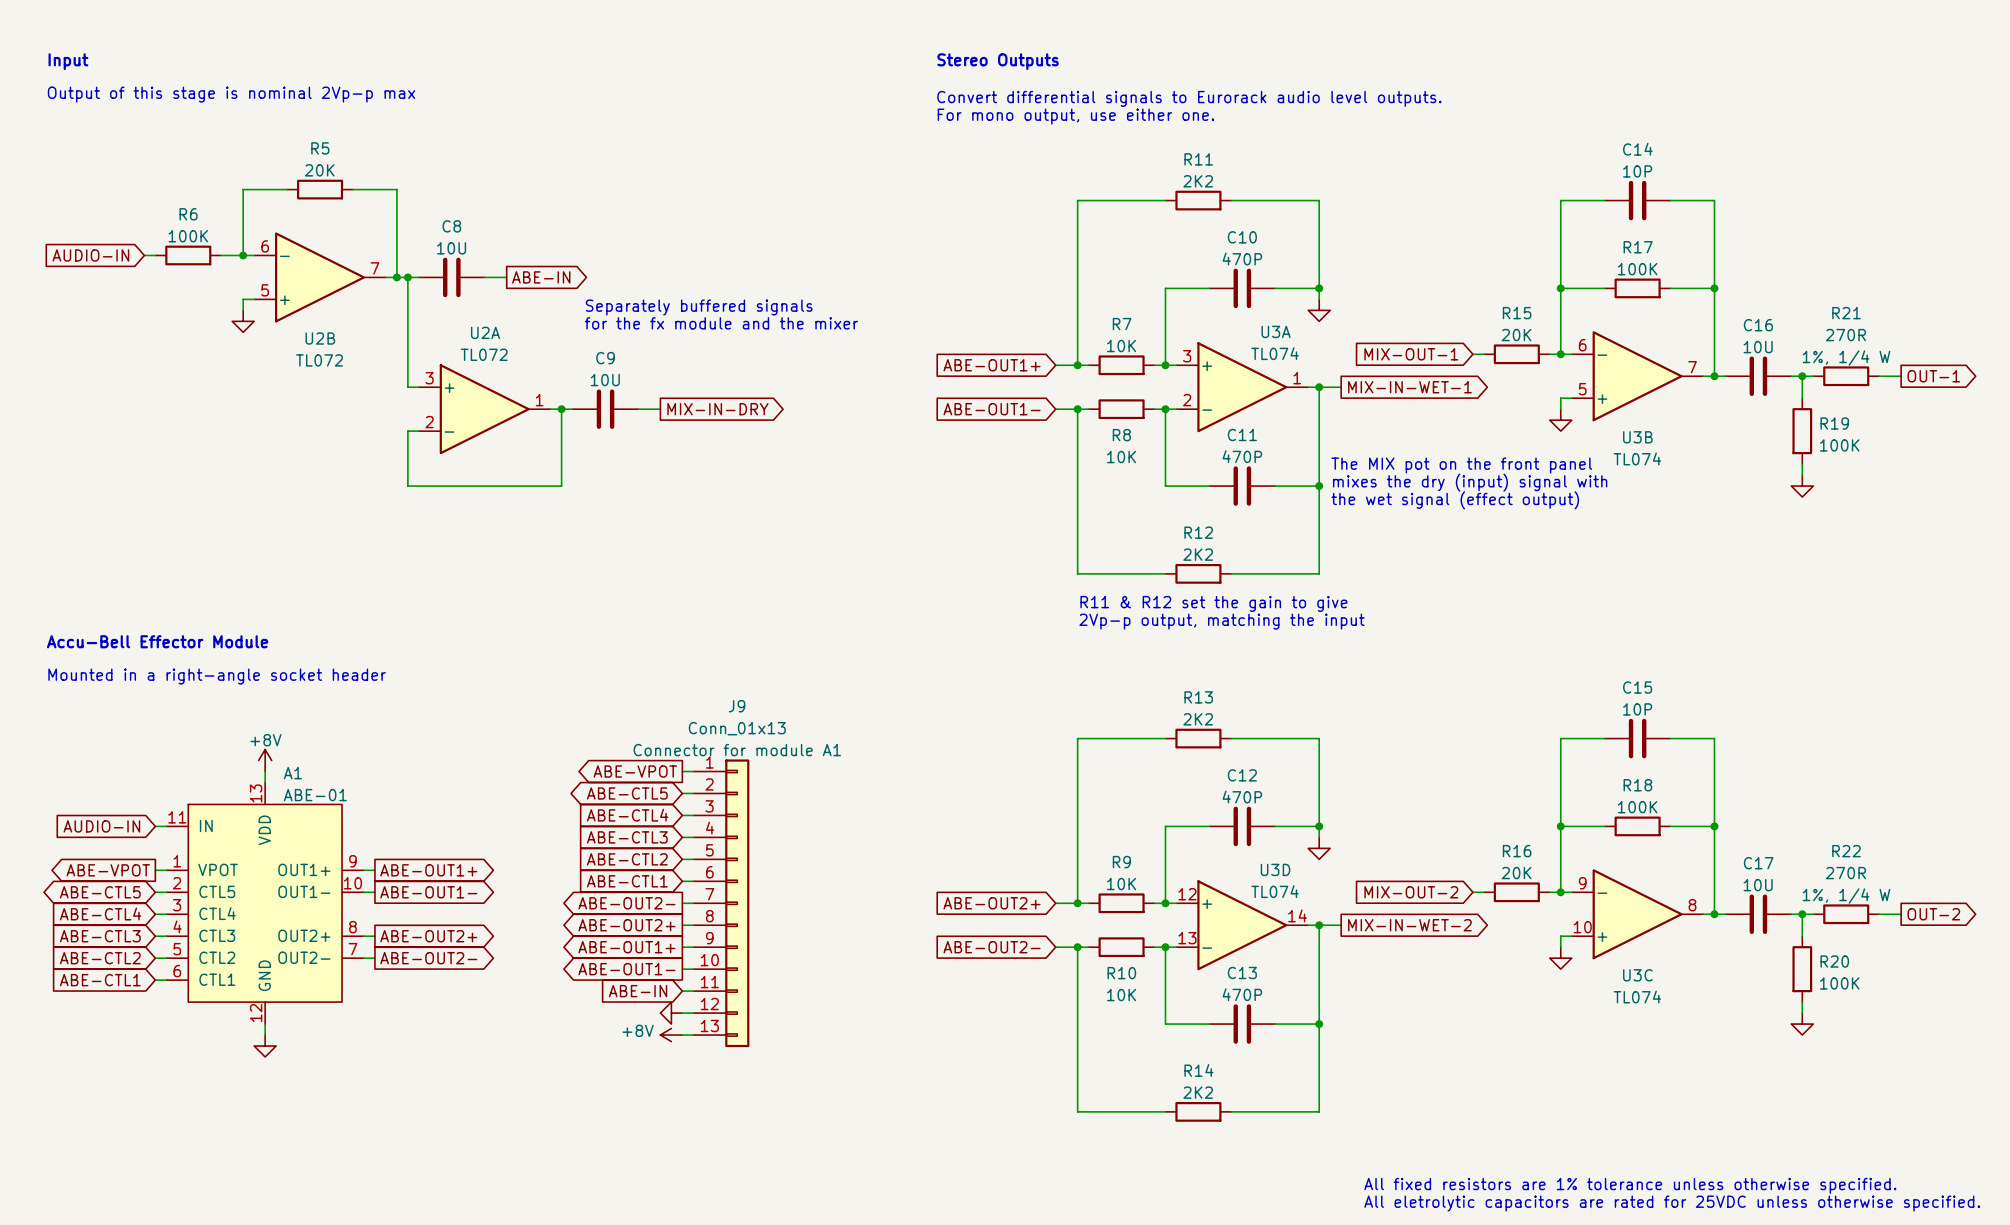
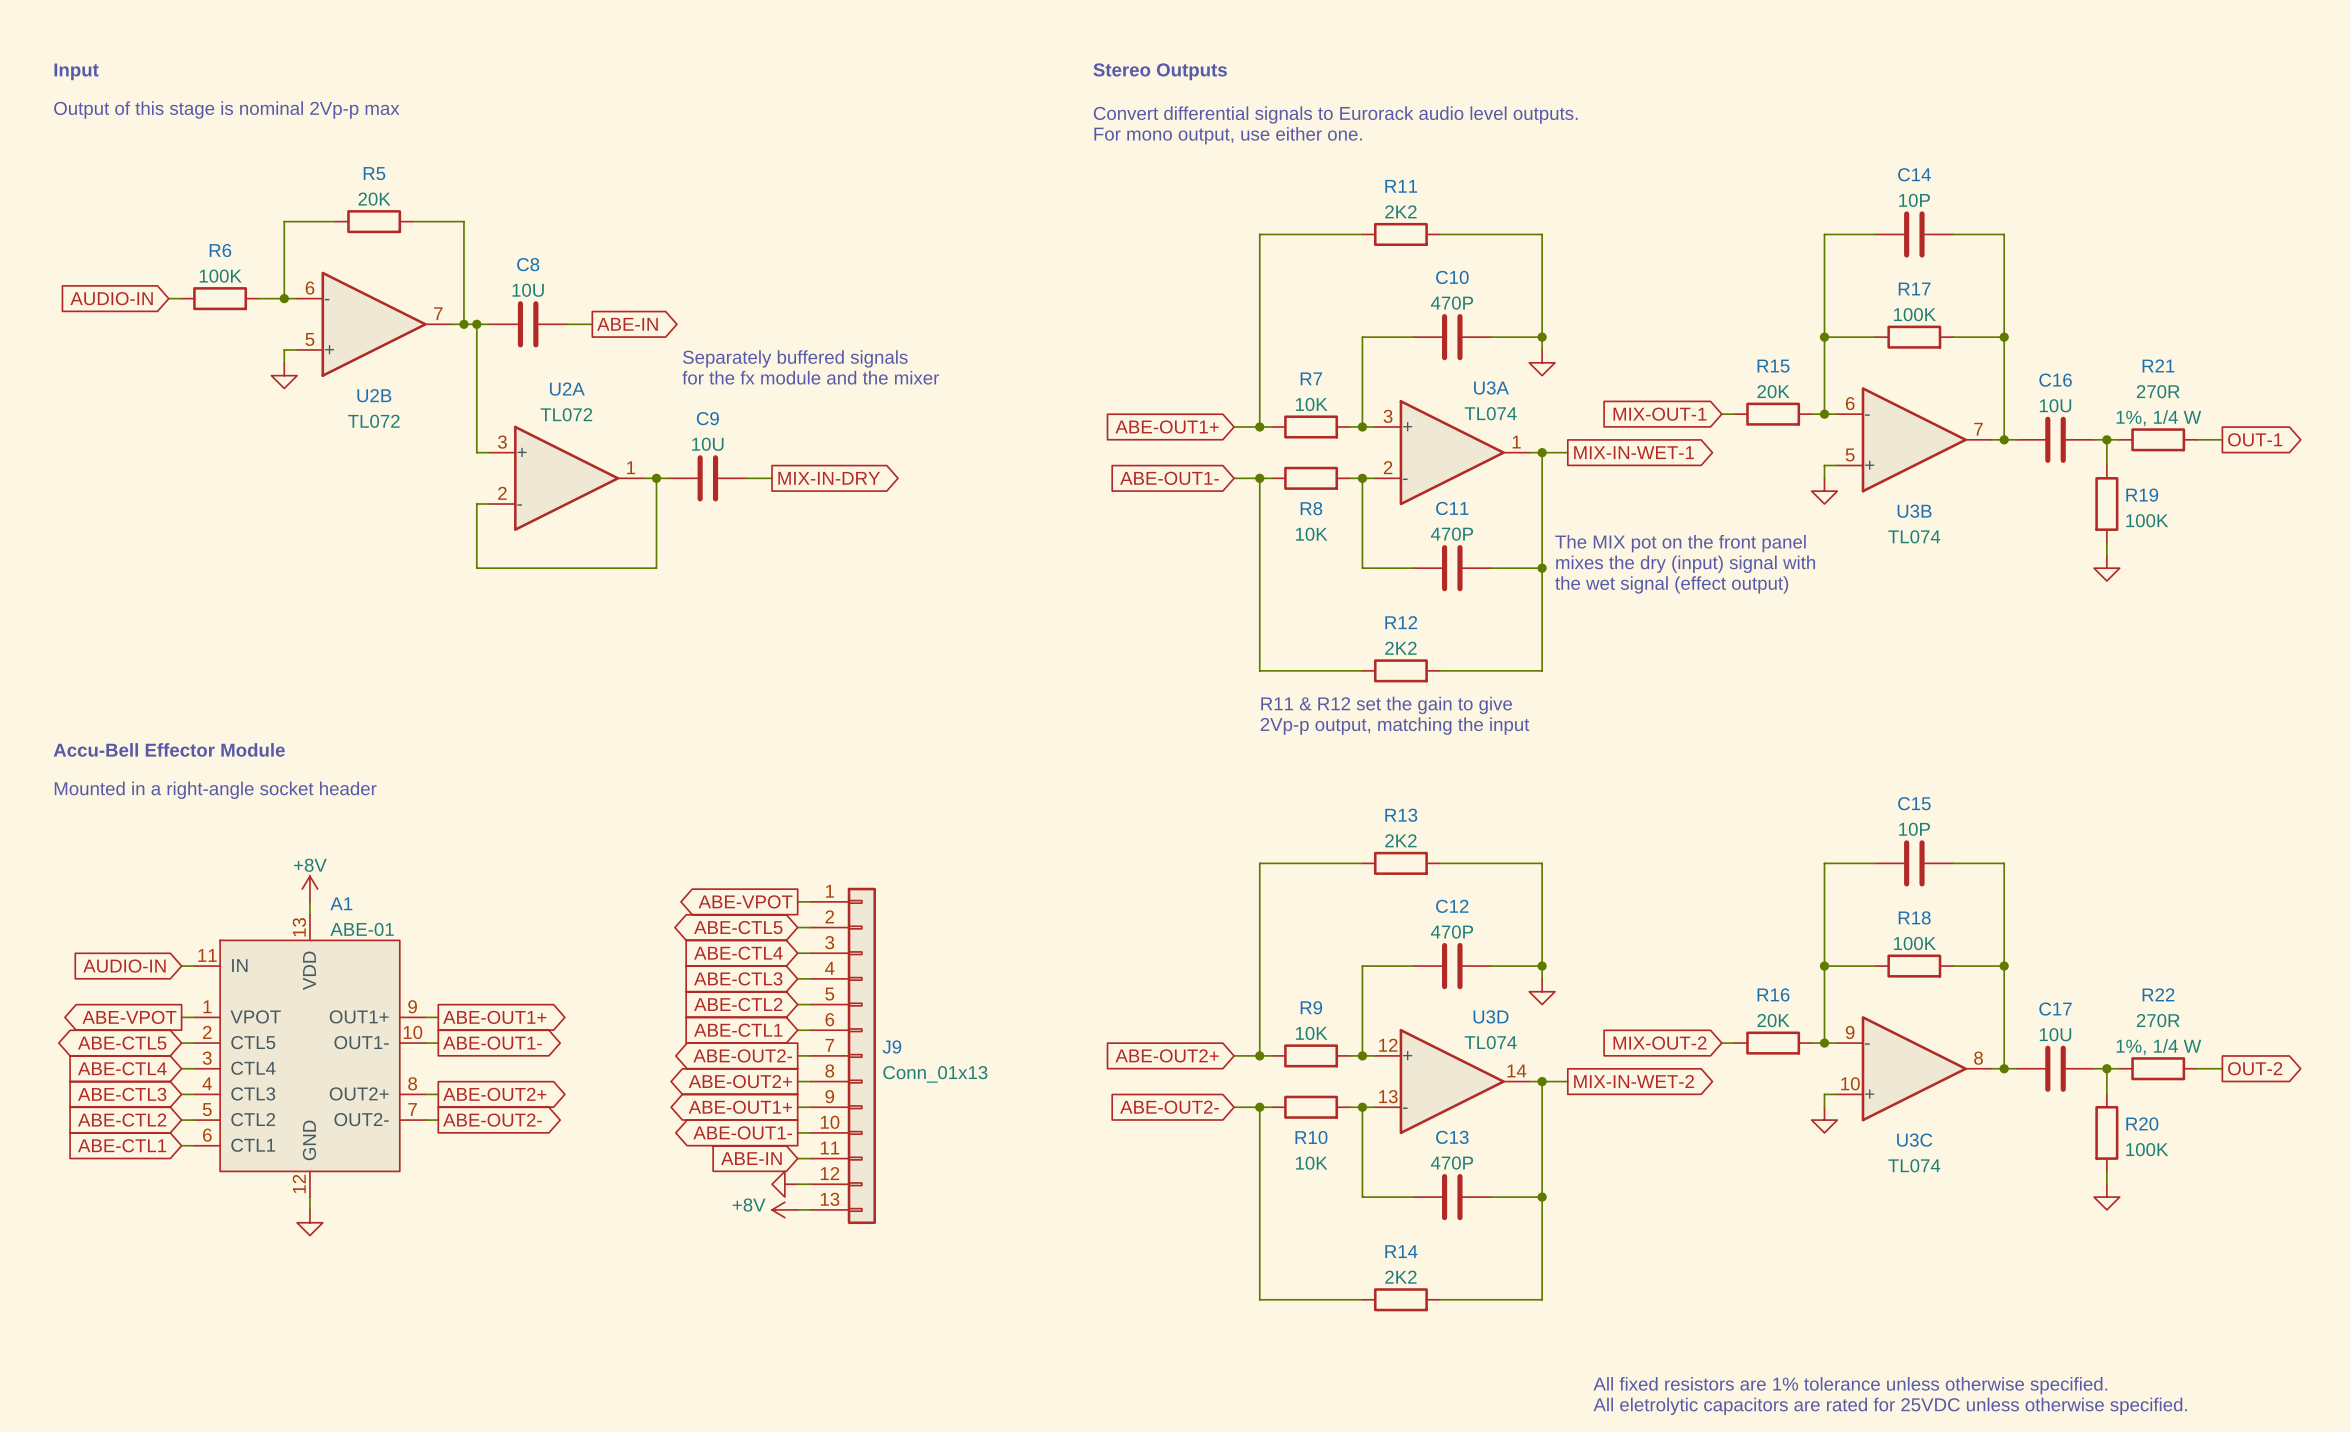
J9 name position: J9 (737, 706) -> J9 (891, 1046)
J9 value position: Conn_01x13 (737, 728) -> Conn_01x13 (935, 1074)
J9 text: Connector for module A1 (737, 750) -> none

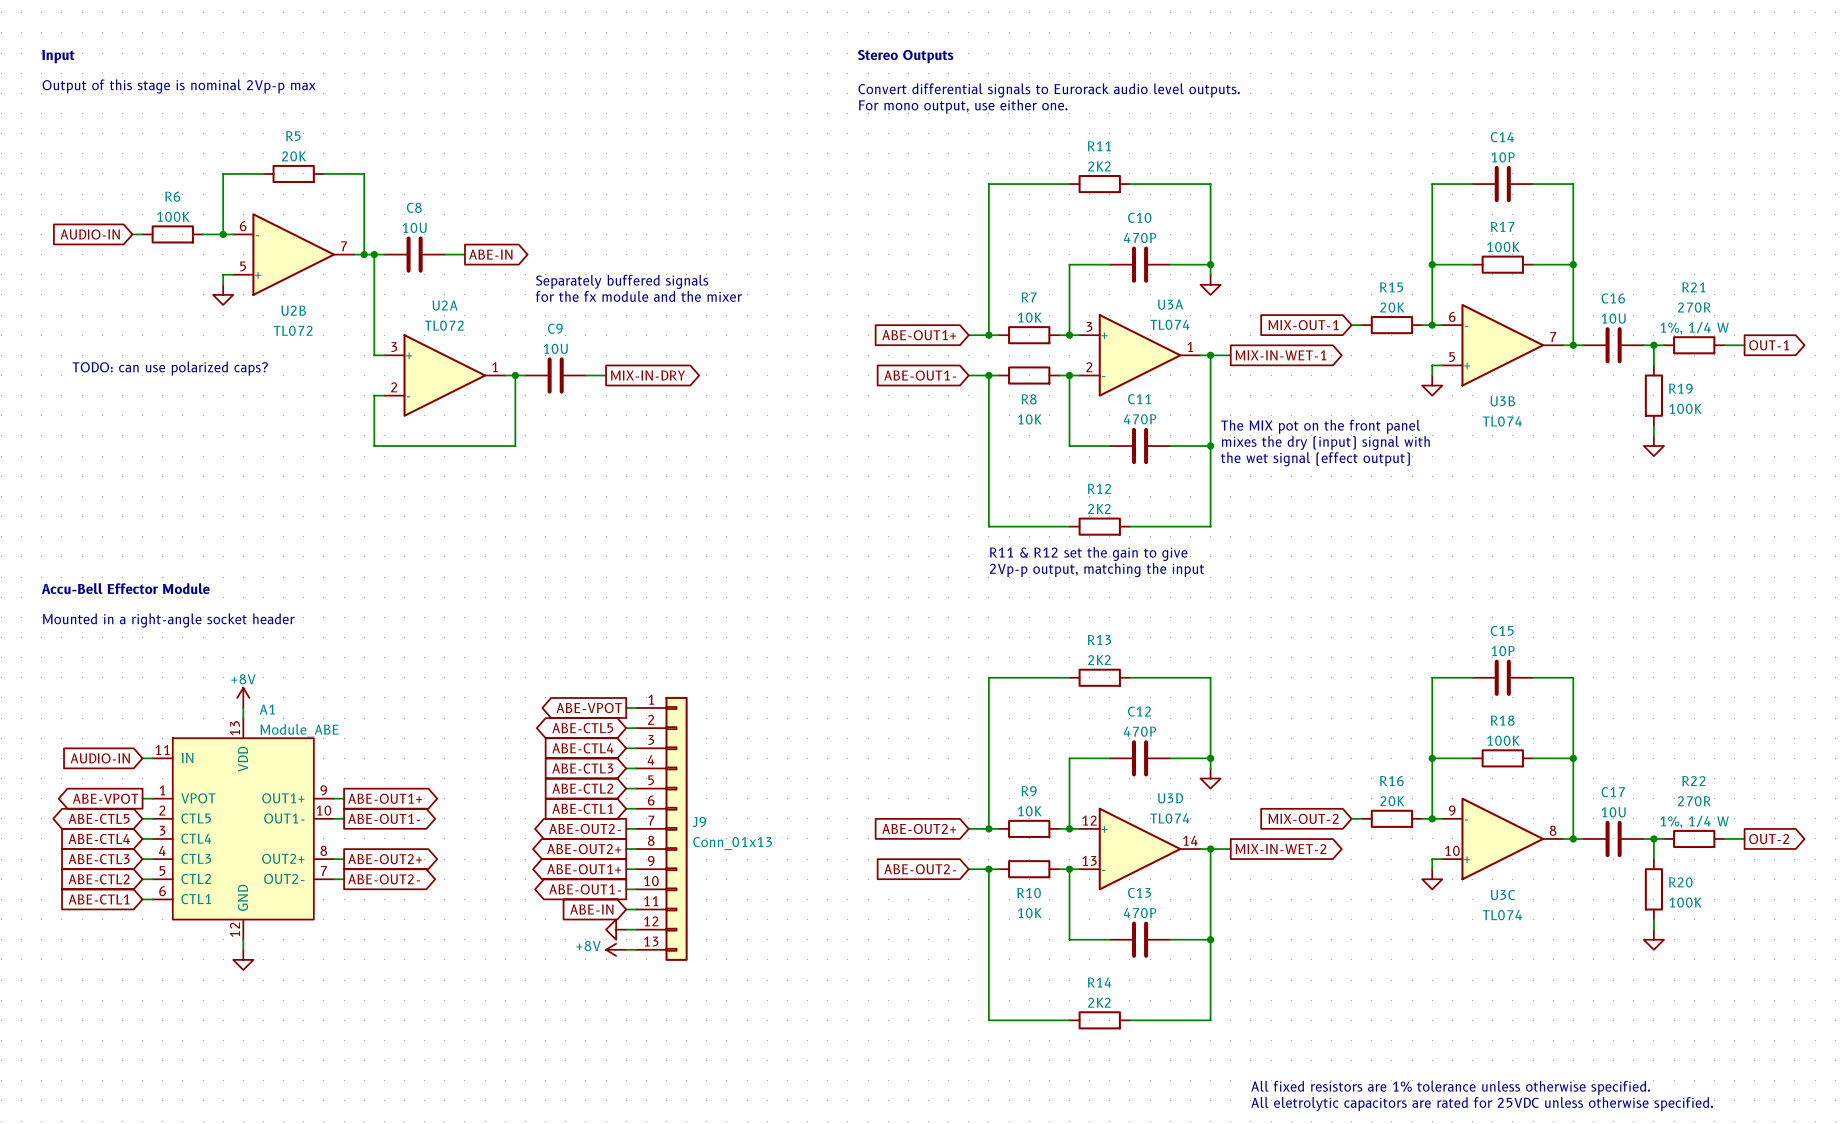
text: none -> TODO: can use polarized caps? (170, 368)
A1 value: ABE-01 (362, 929) -> Module_ABE (299, 730)

